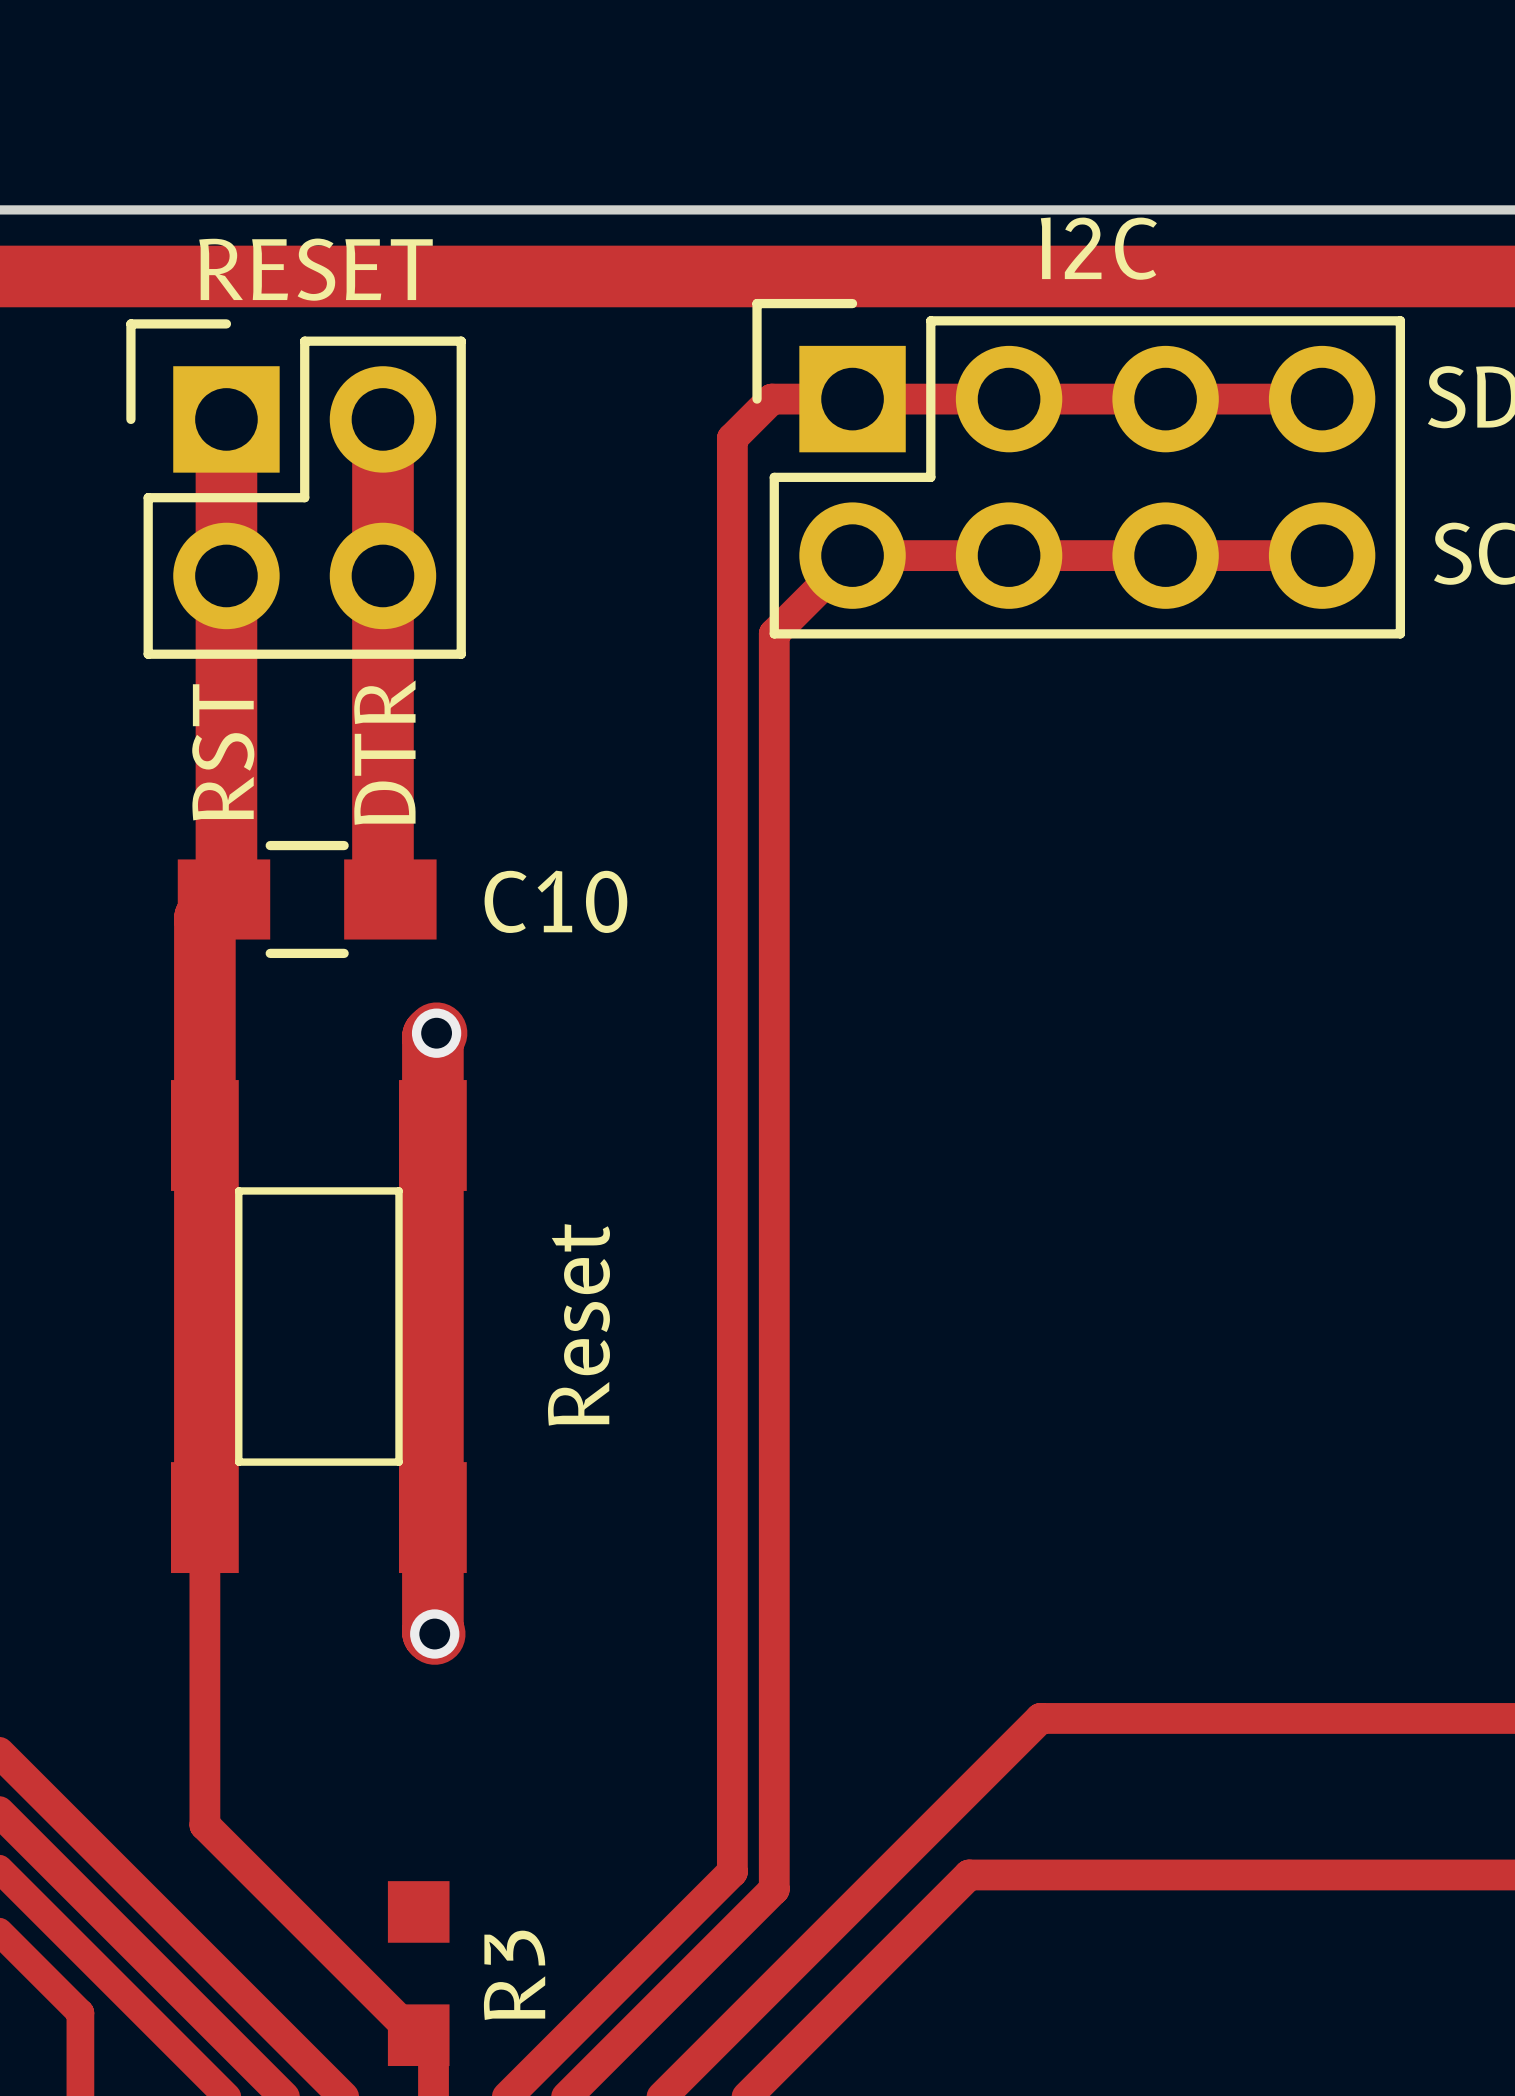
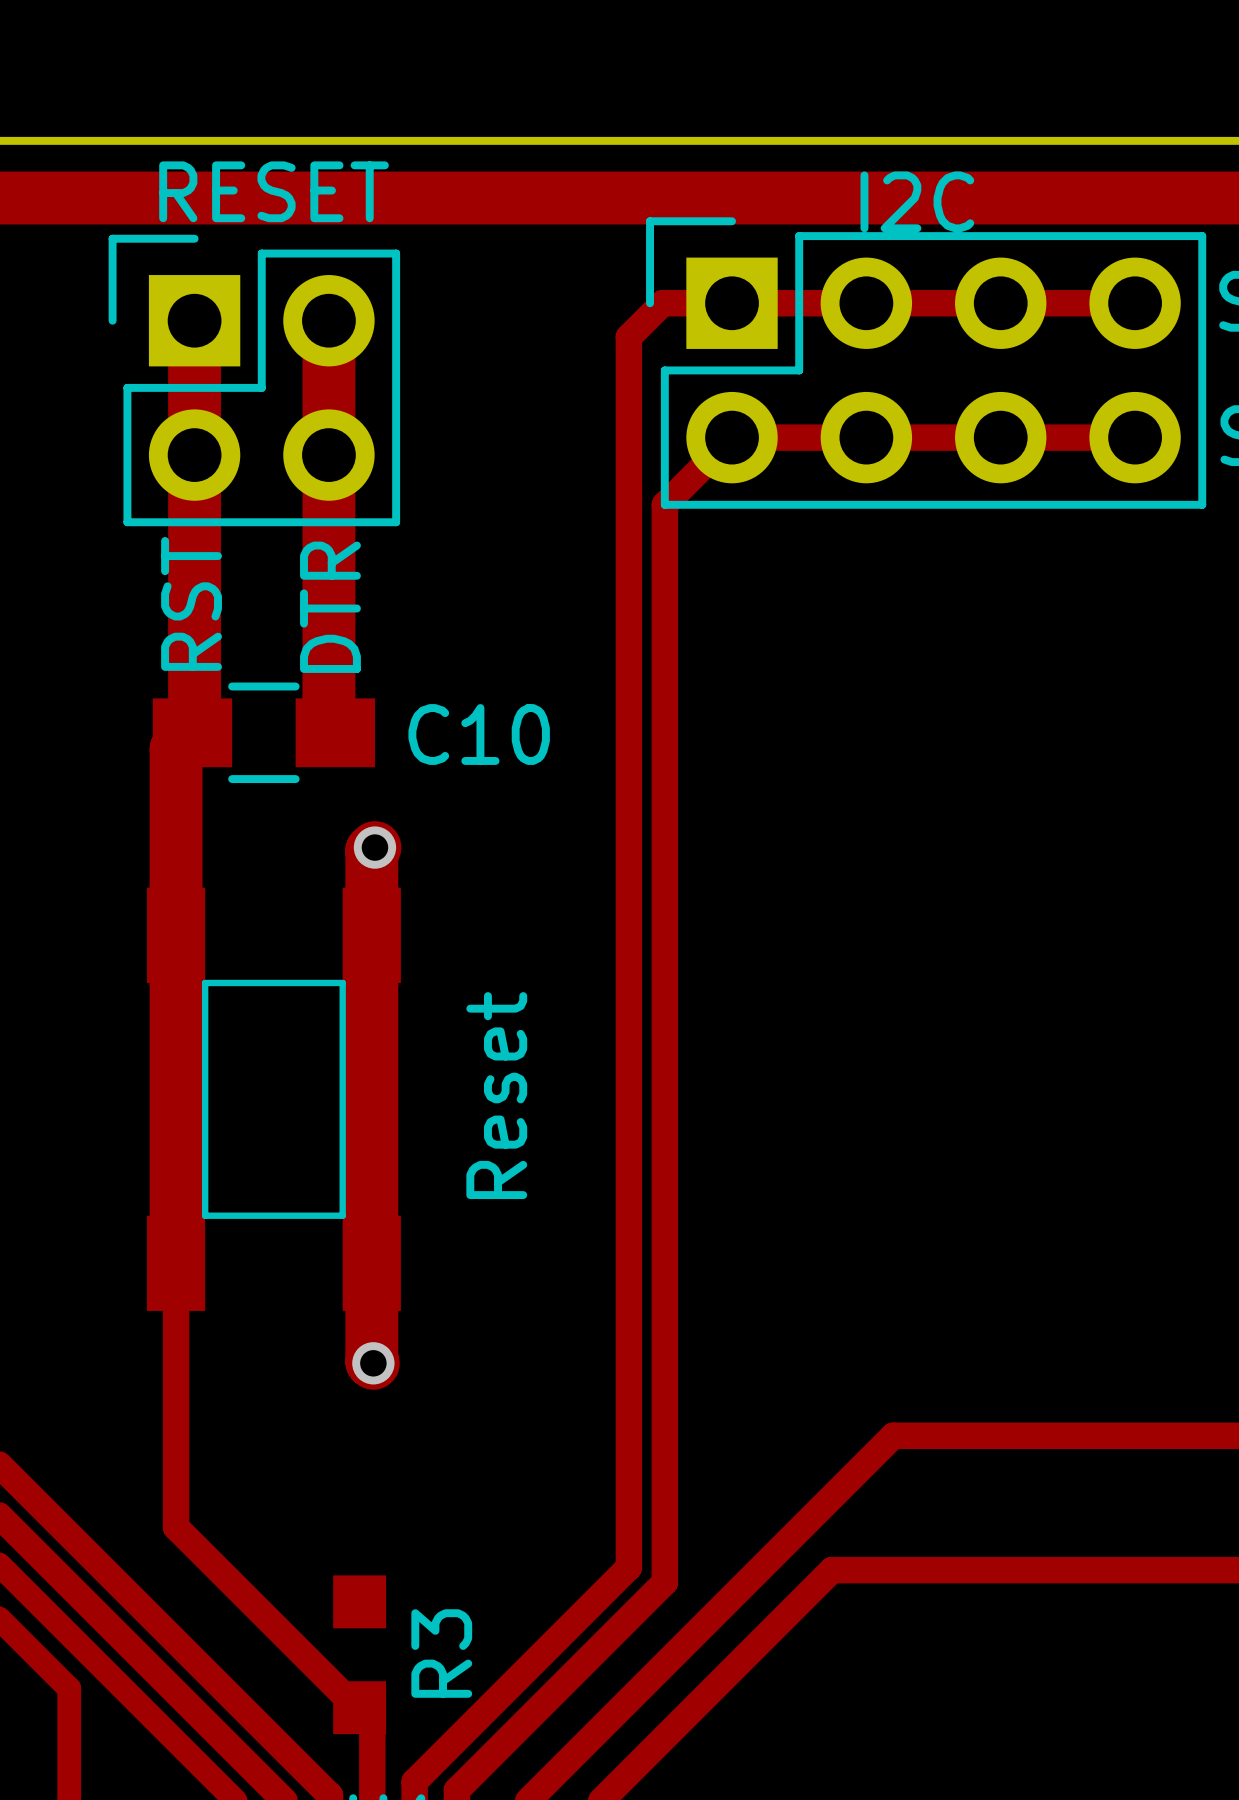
part value position: I2C (1098, 248) -> I2C (917, 201)

